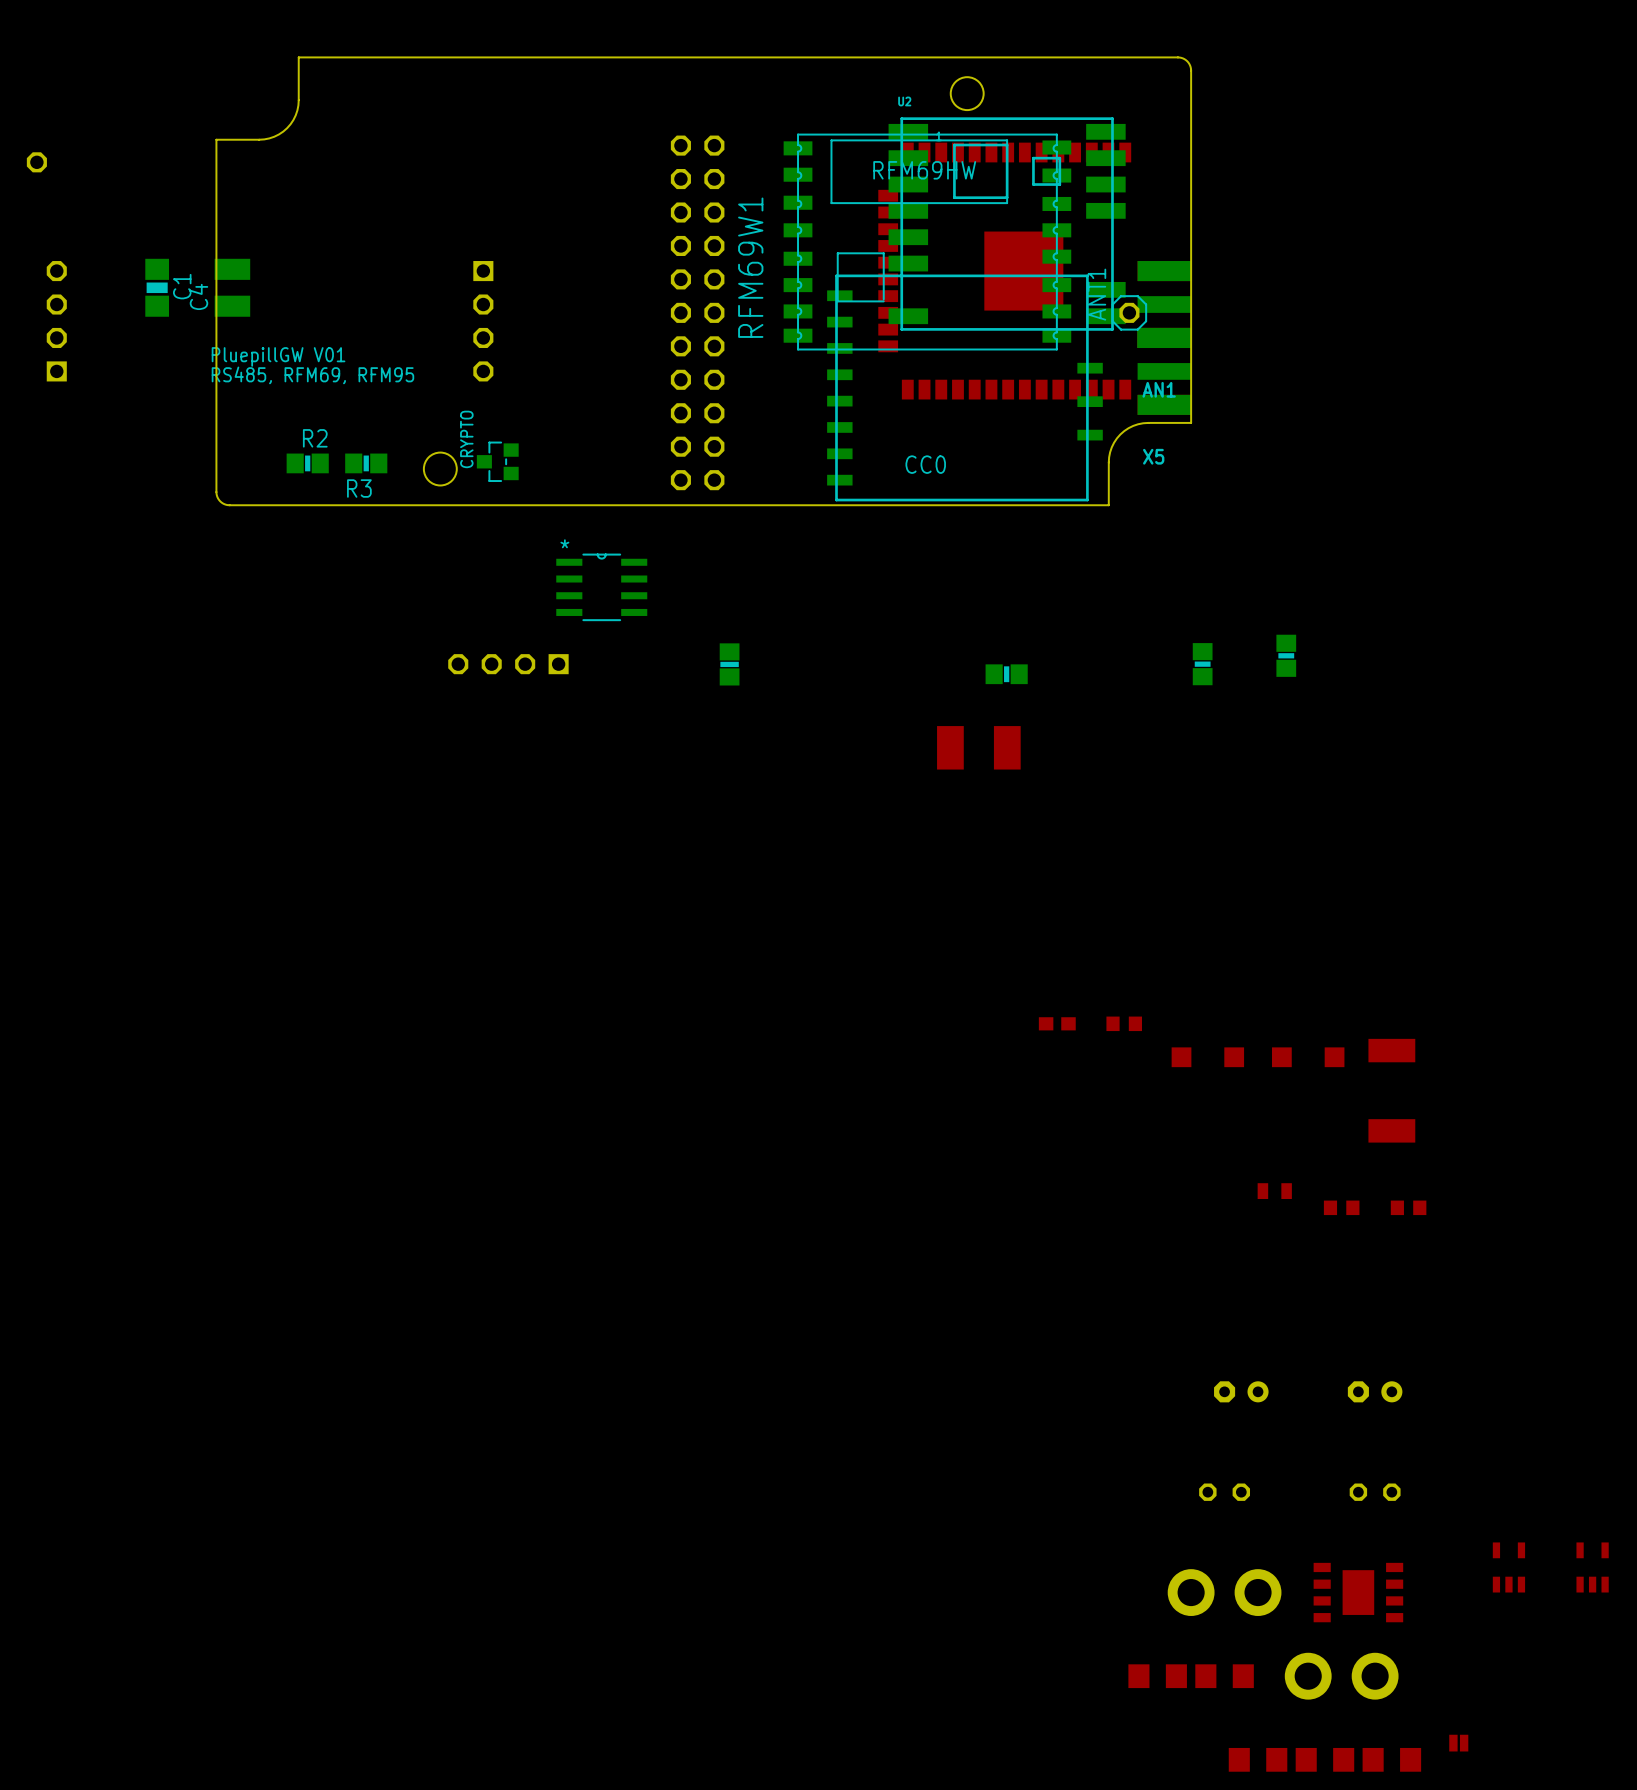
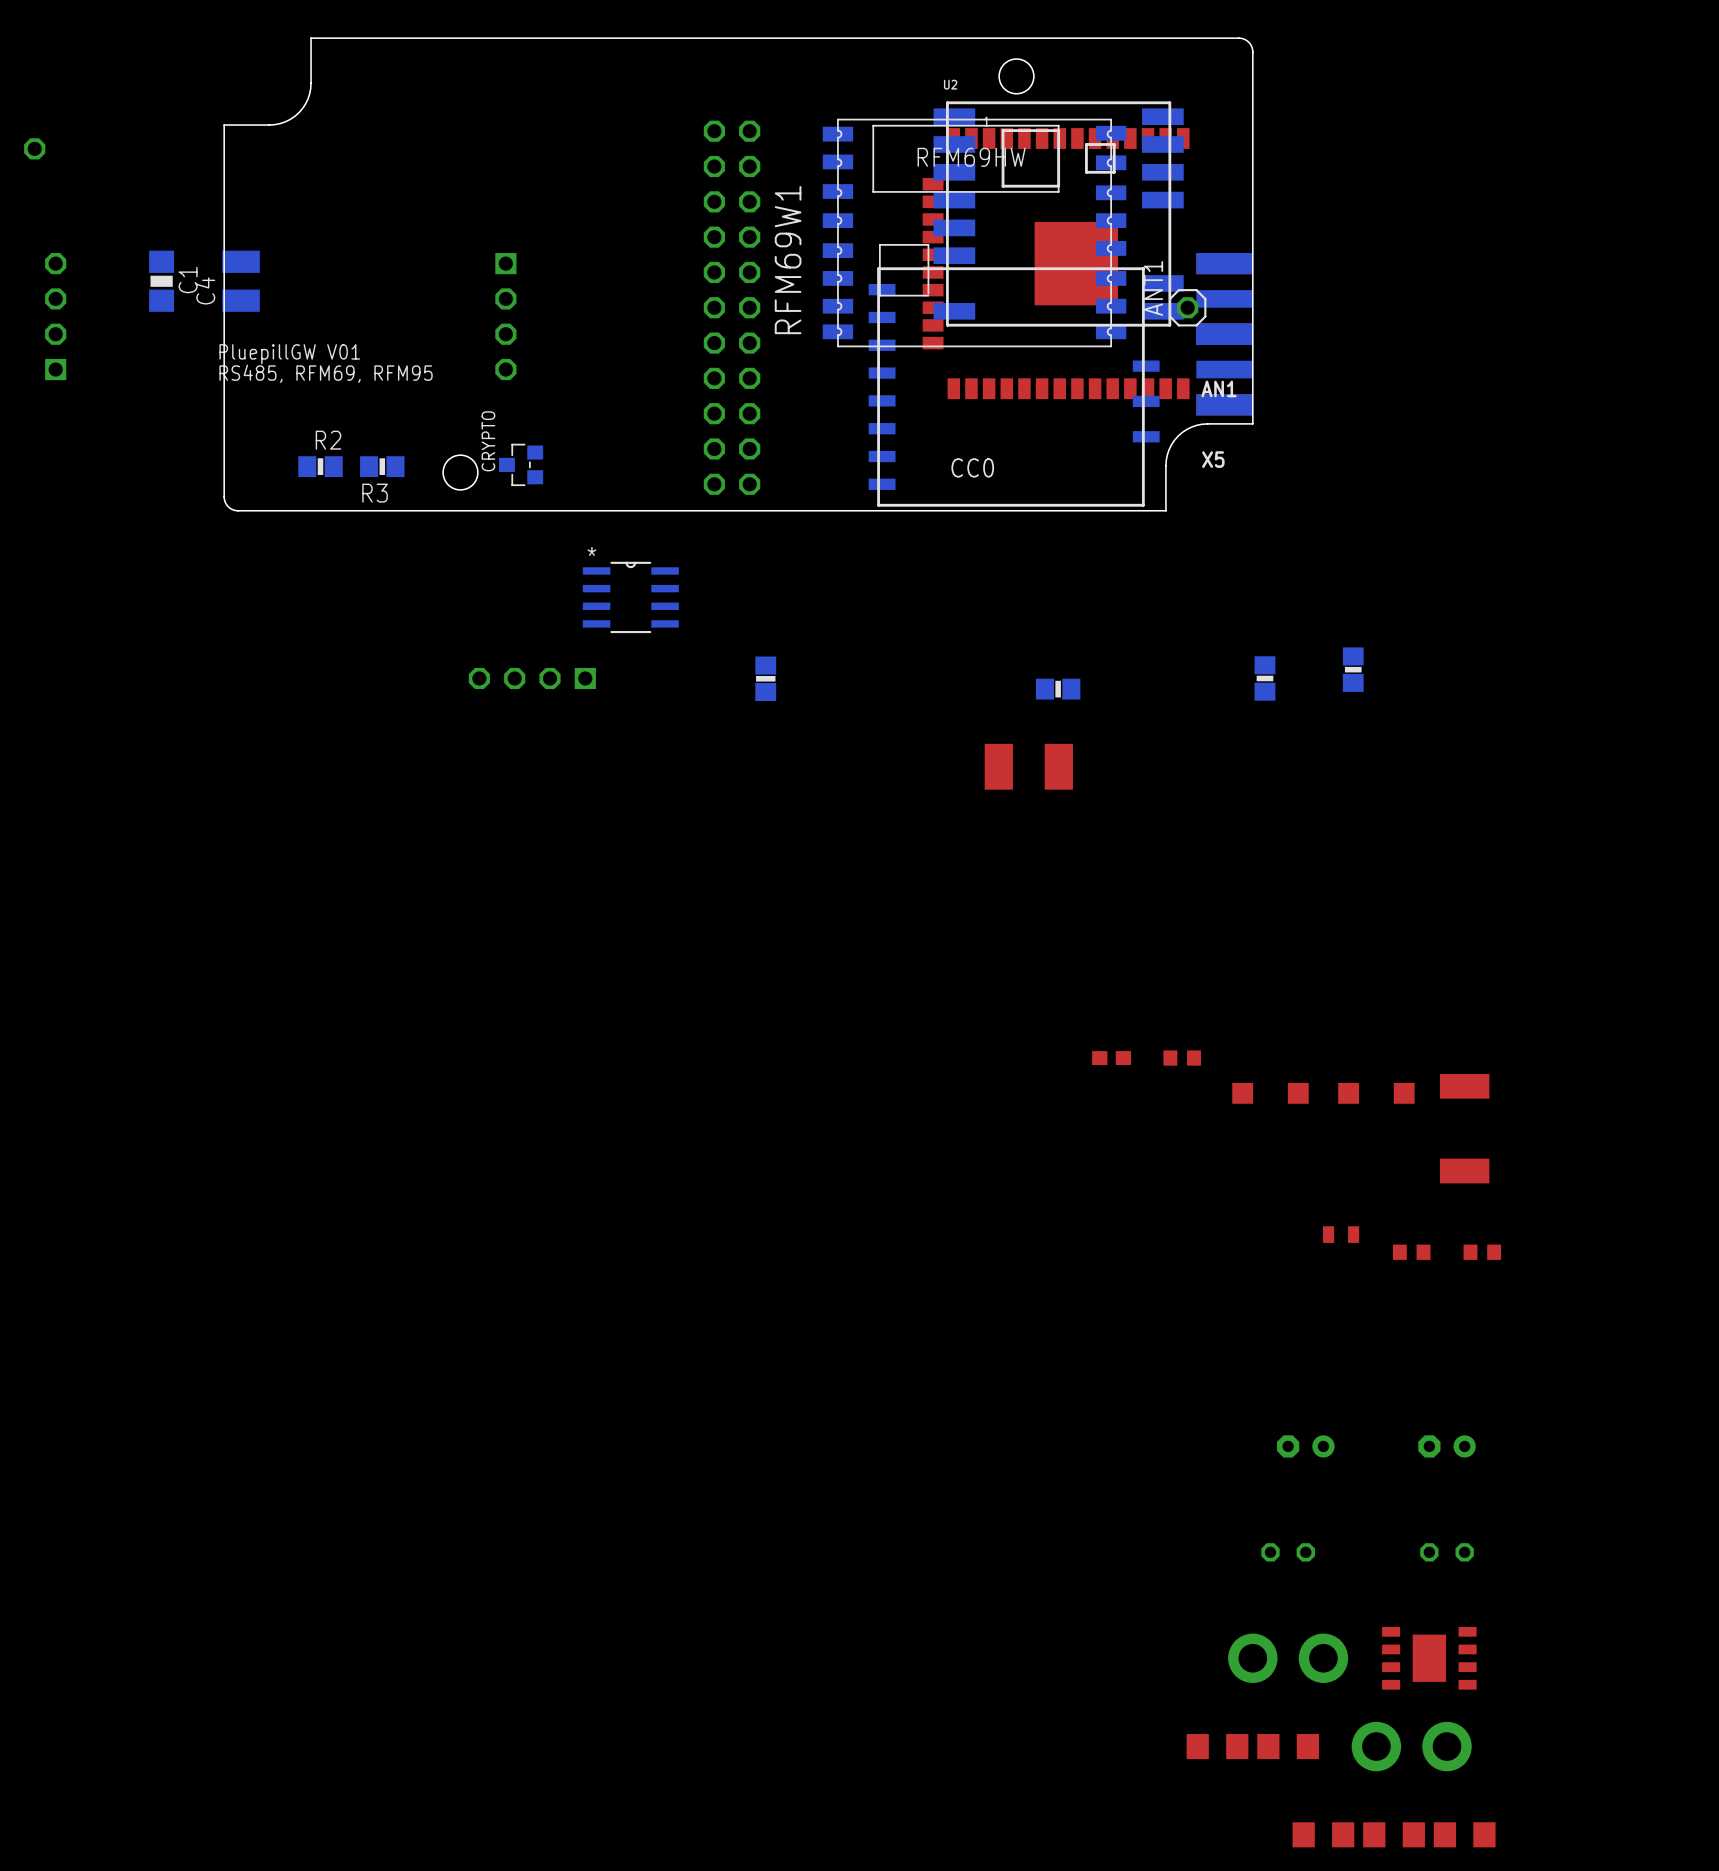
part: (1508, 1567) -> none
part: (1592, 1567) -> none
part: (1458, 1743) -> none

